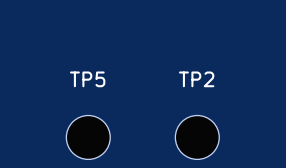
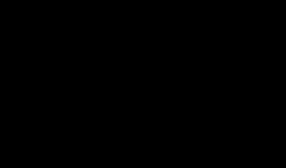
TP5: (88, 137) -> none
TP2: (197, 137) -> none

